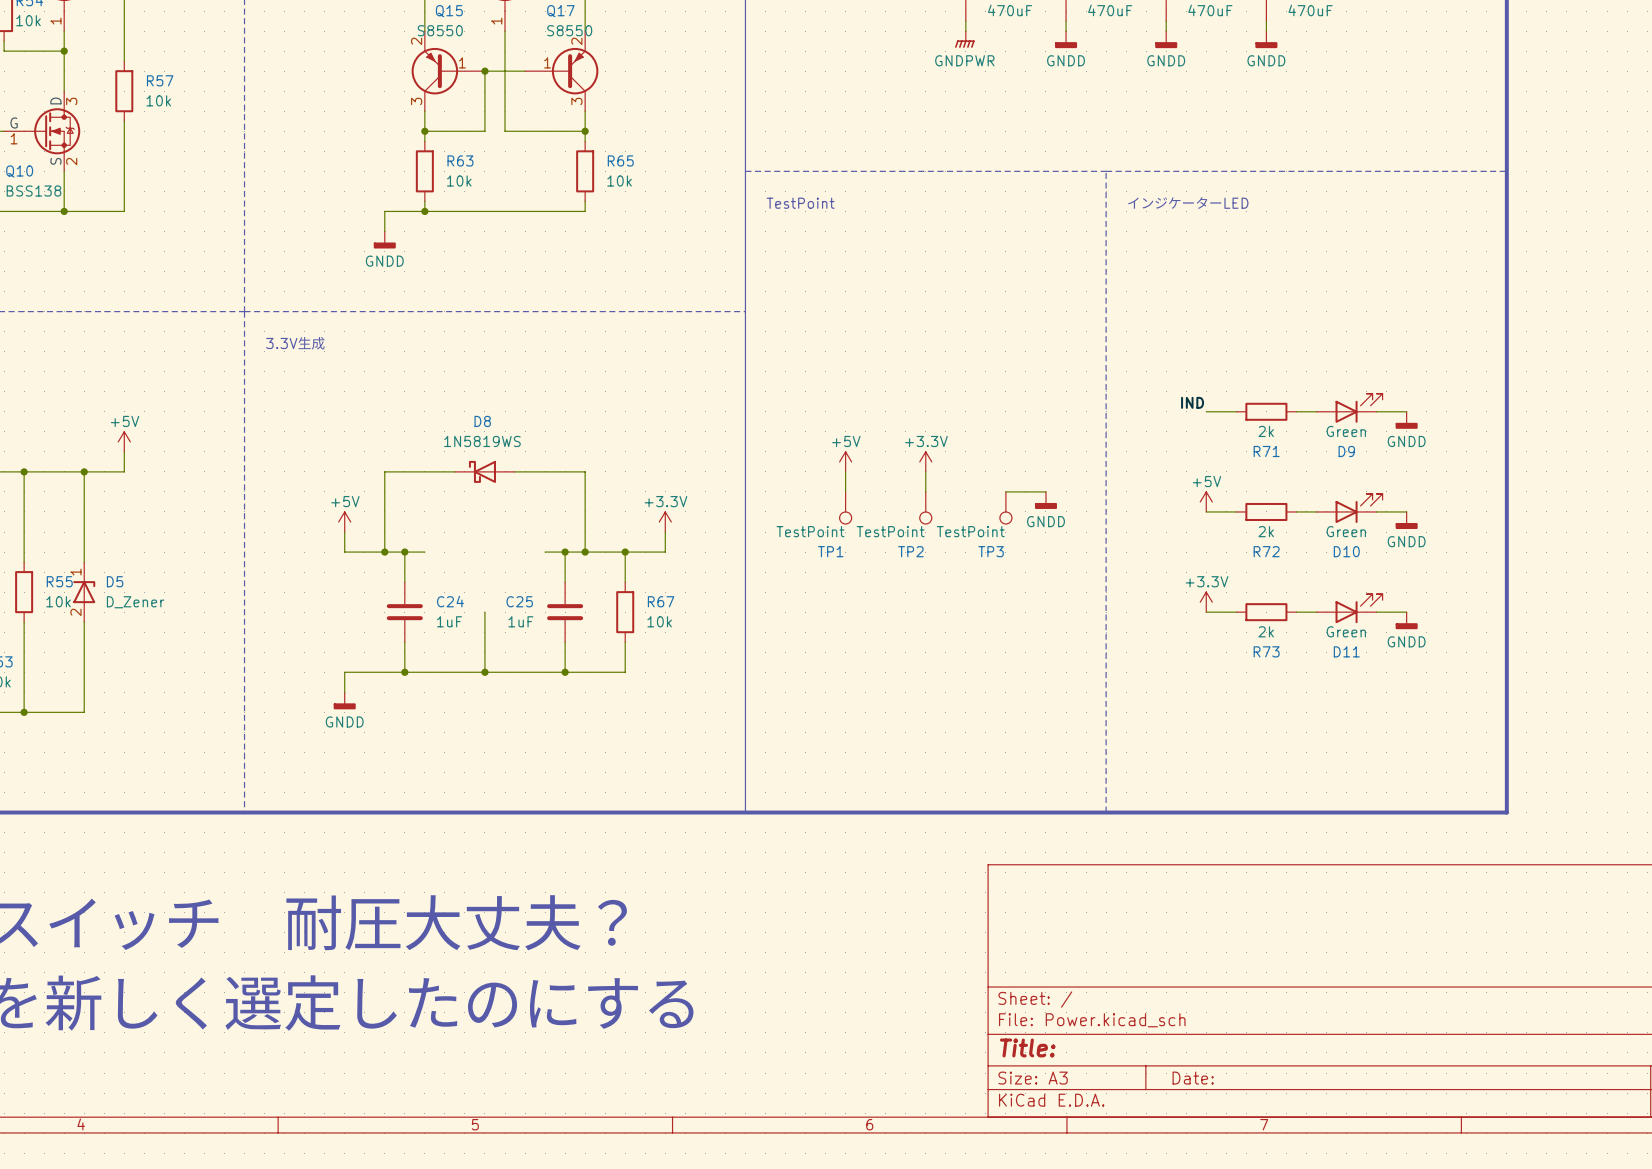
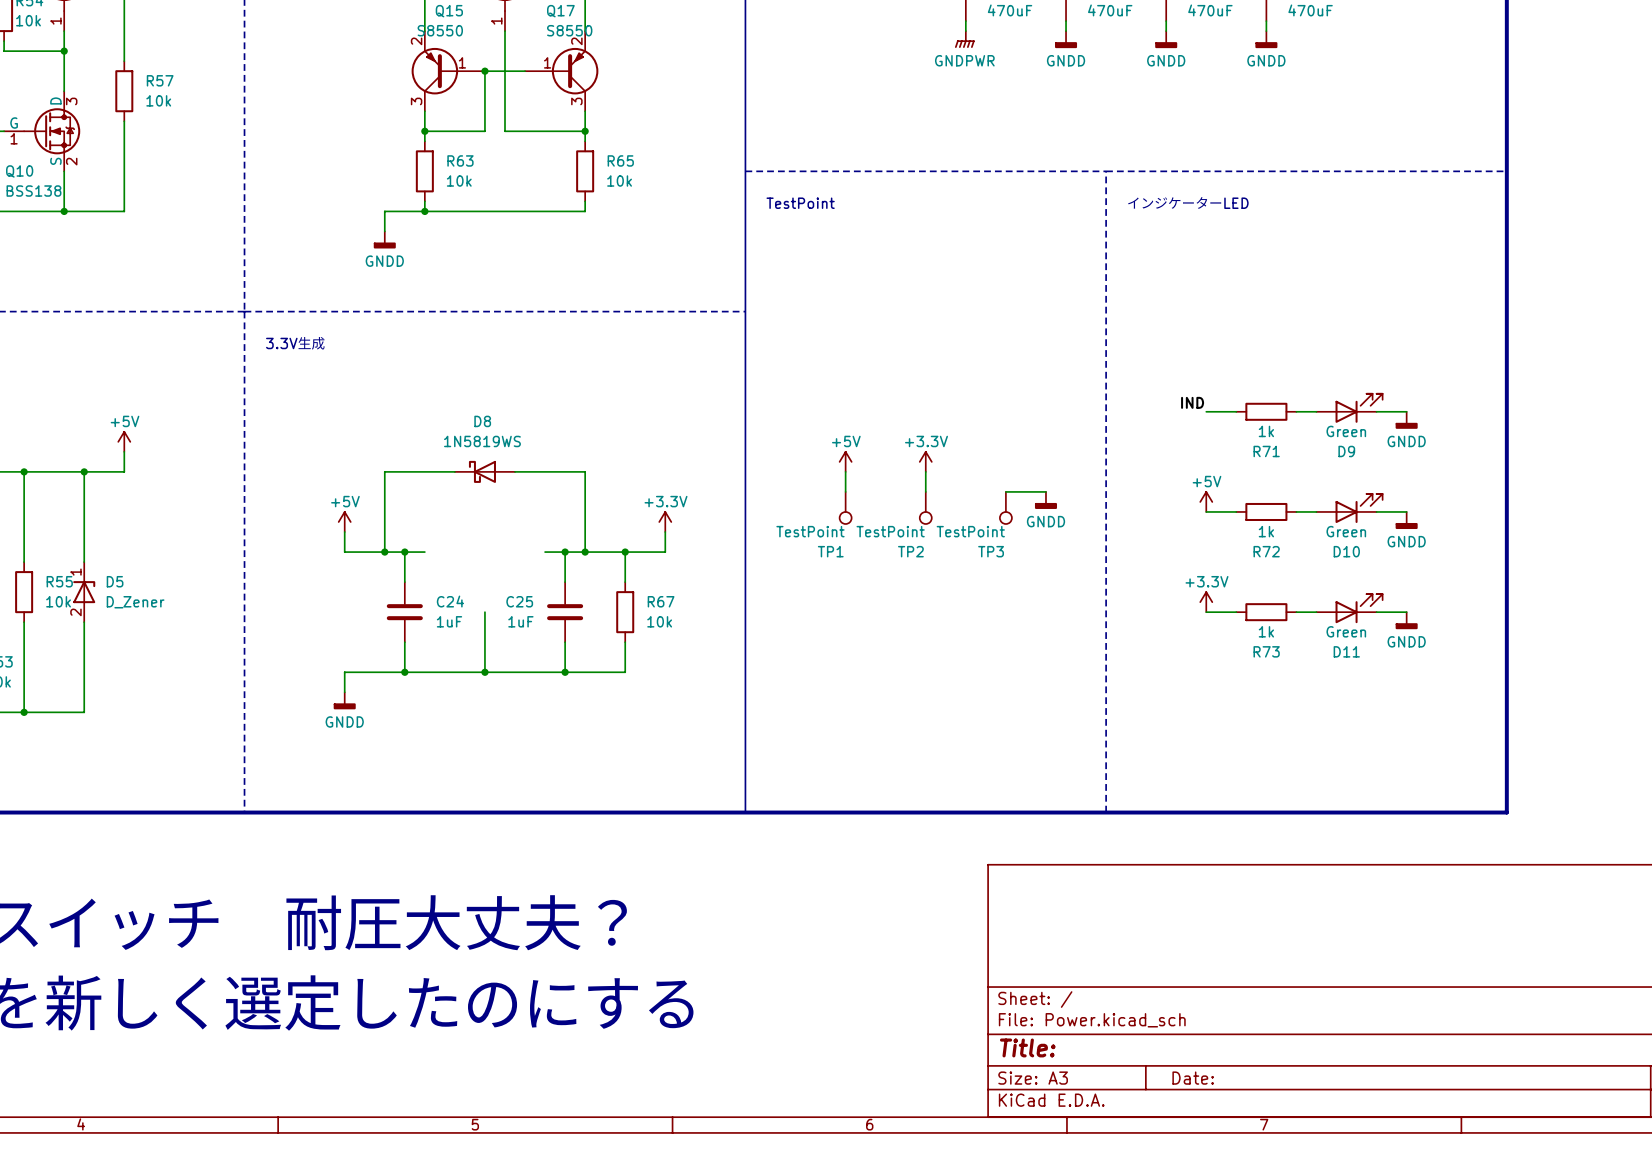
R71 value: 2k (1266, 431) -> 1k (1266, 431)
R72 value: 2k (1266, 531) -> 1k (1266, 531)
R73 value: 2k (1266, 631) -> 1k (1266, 631)

